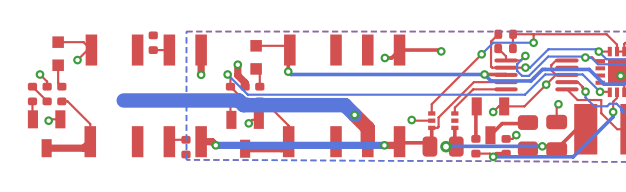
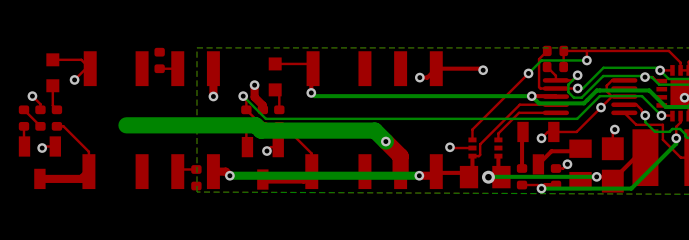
part footprint: [546, 114, 568, 157] -> [601, 137, 624, 193]
part footprint: [517, 115, 539, 157] -> [569, 139, 592, 191]
part footprint: [422, 136, 464, 157] -> [459, 165, 511, 189]

